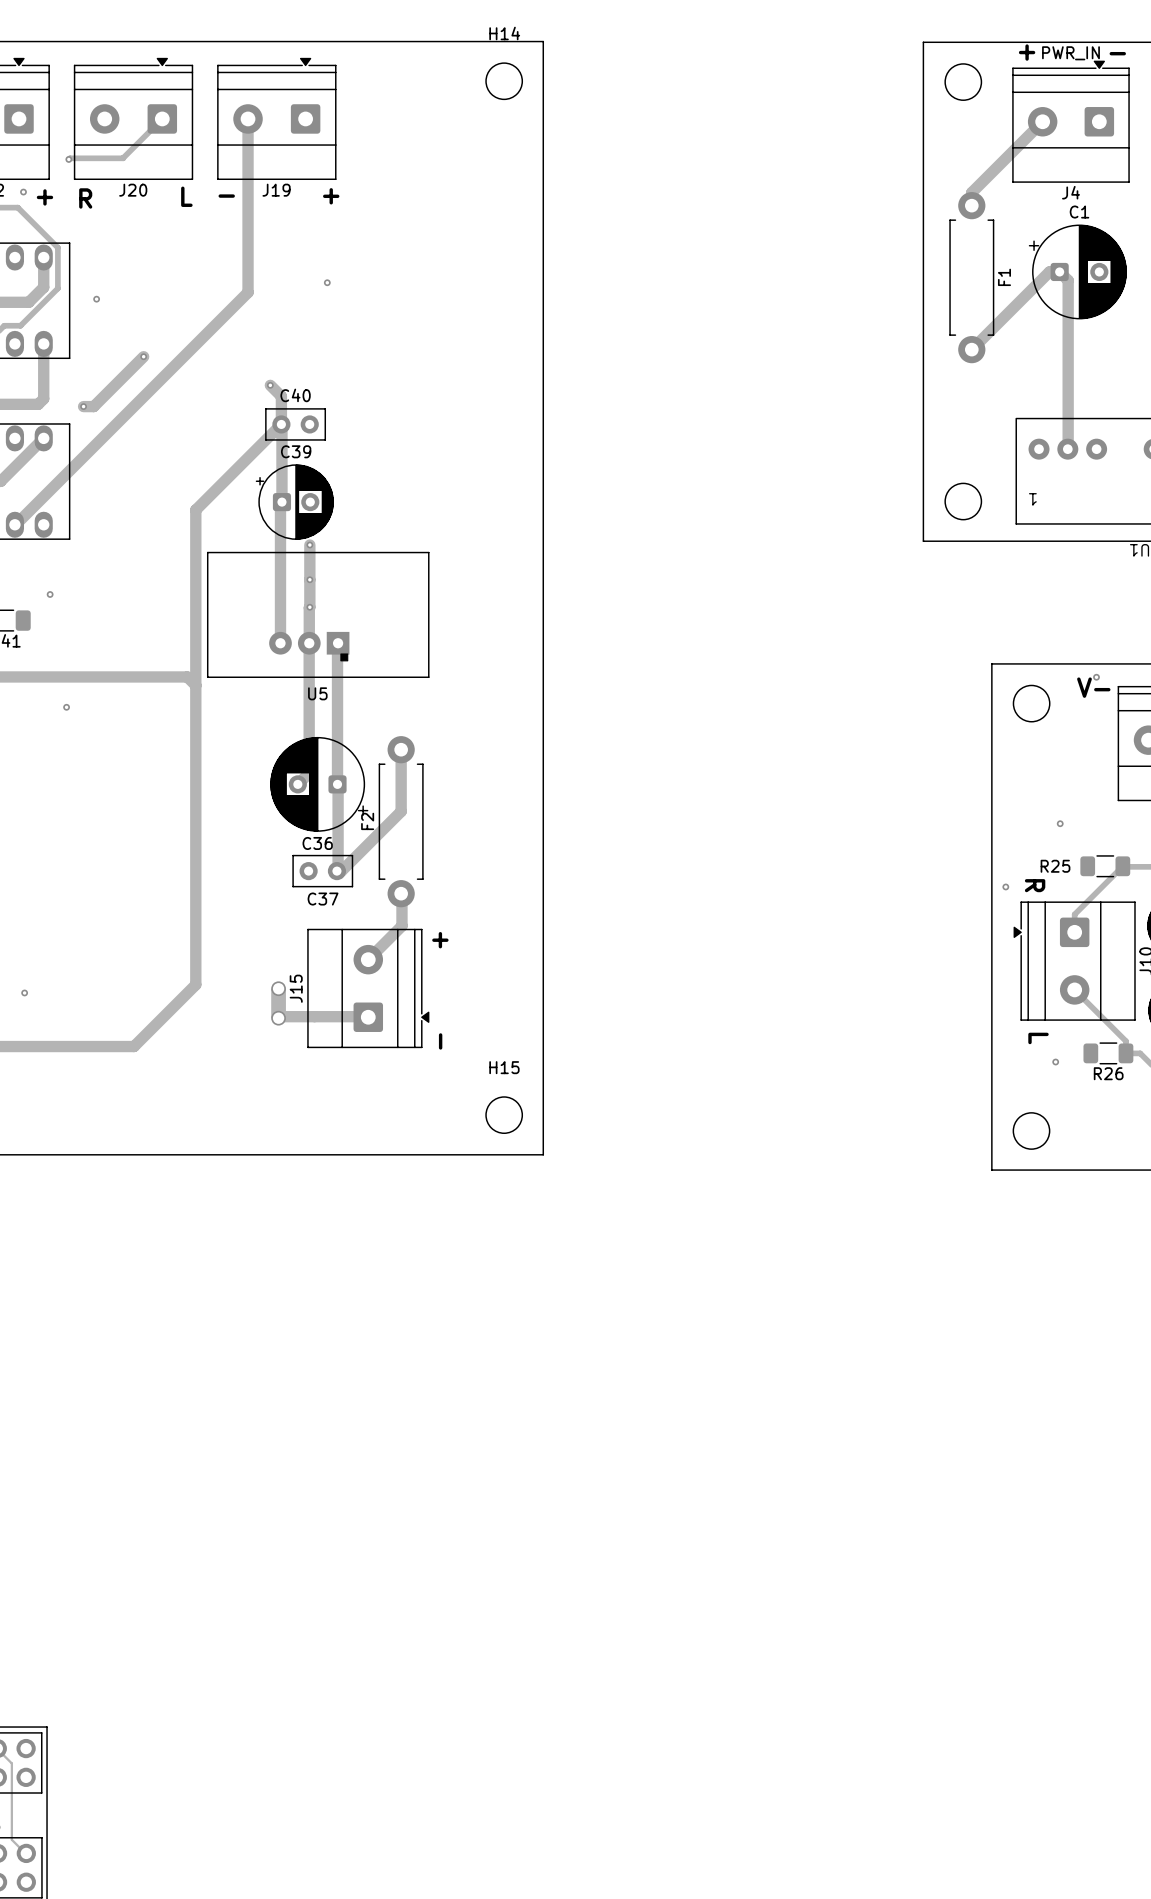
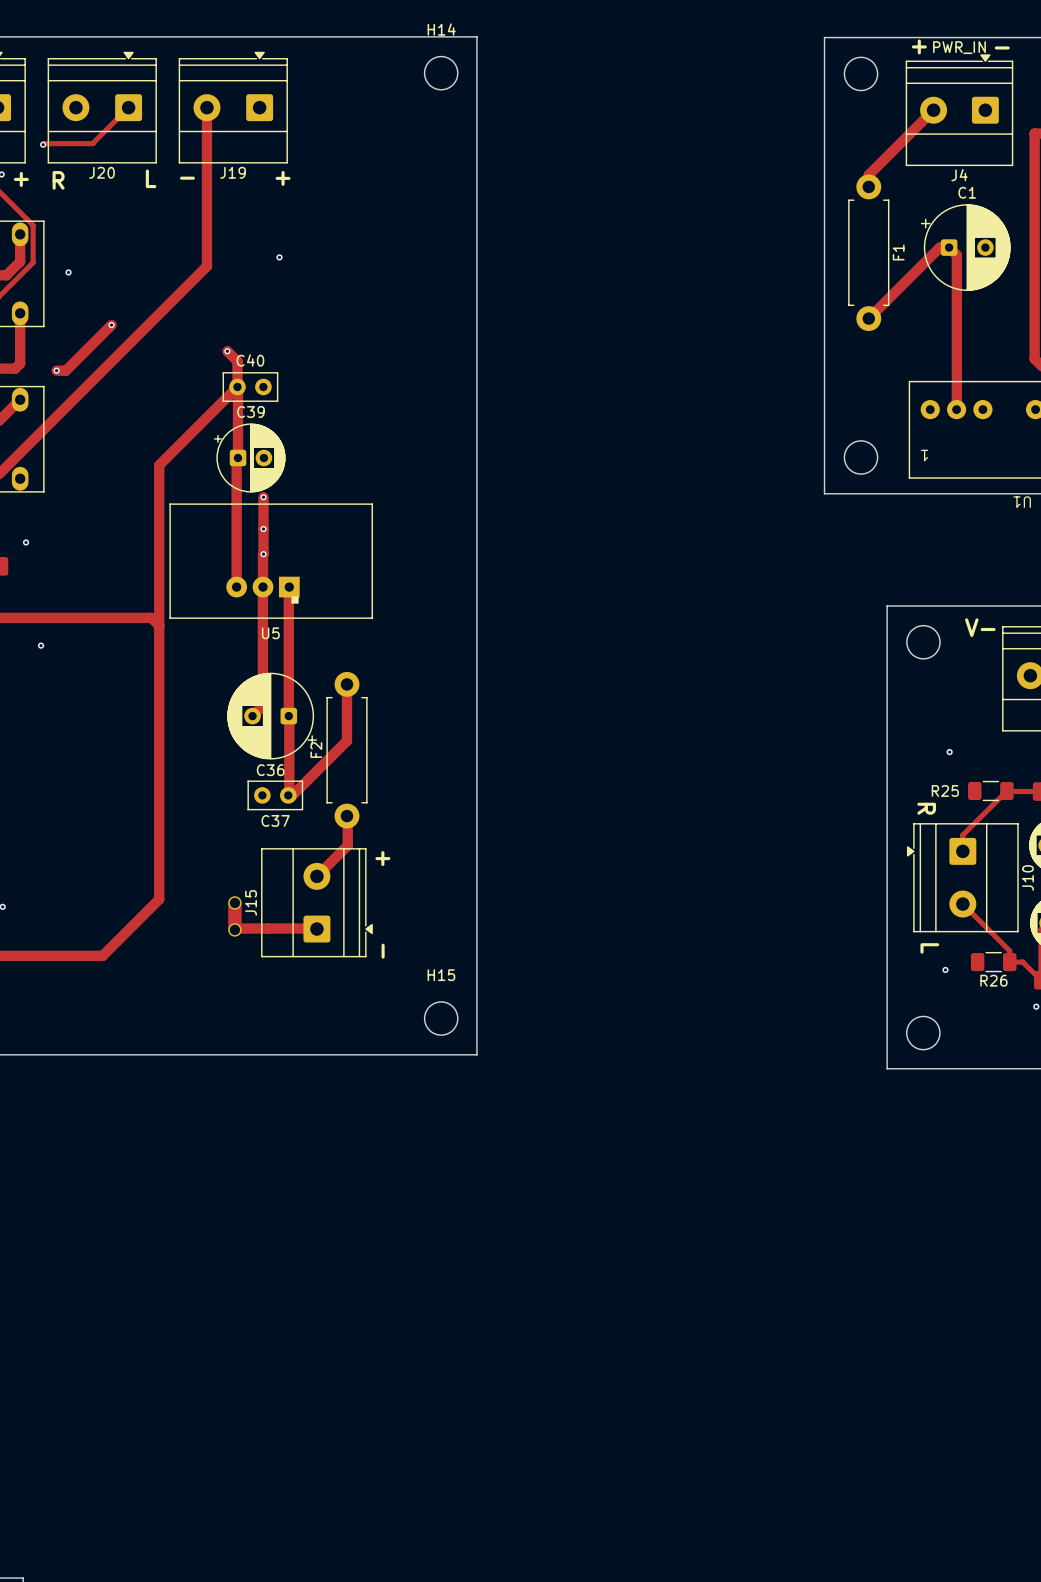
via: (1096, 677) -> none
via: (1005, 886) -> none

